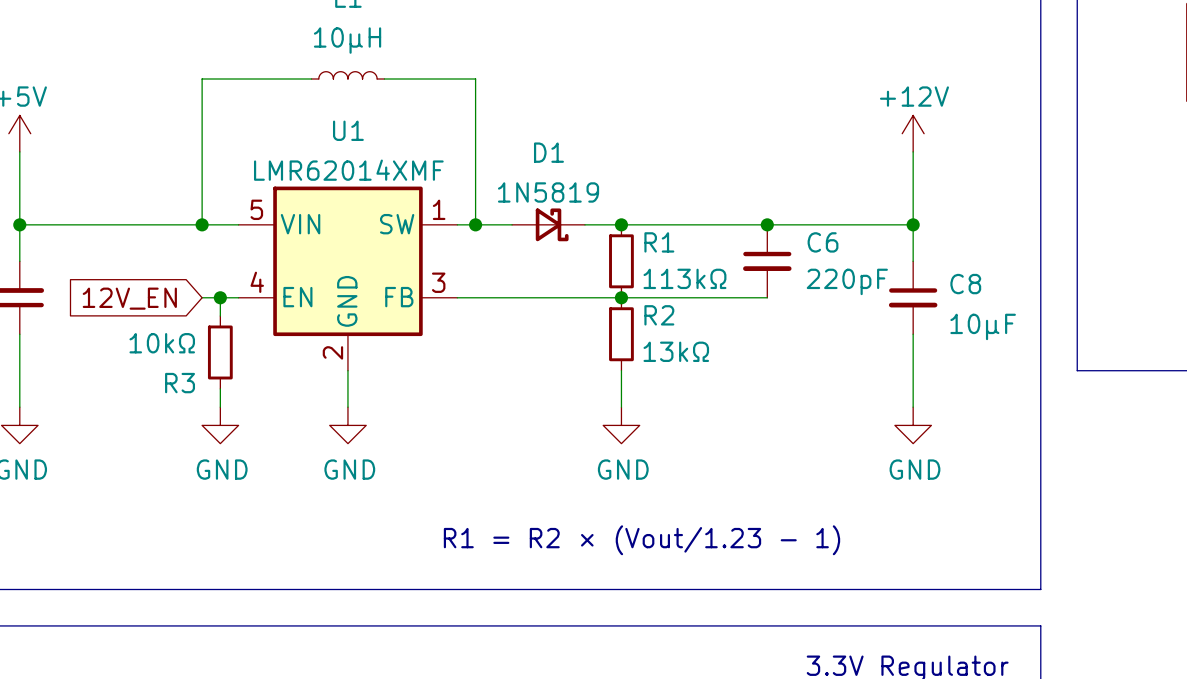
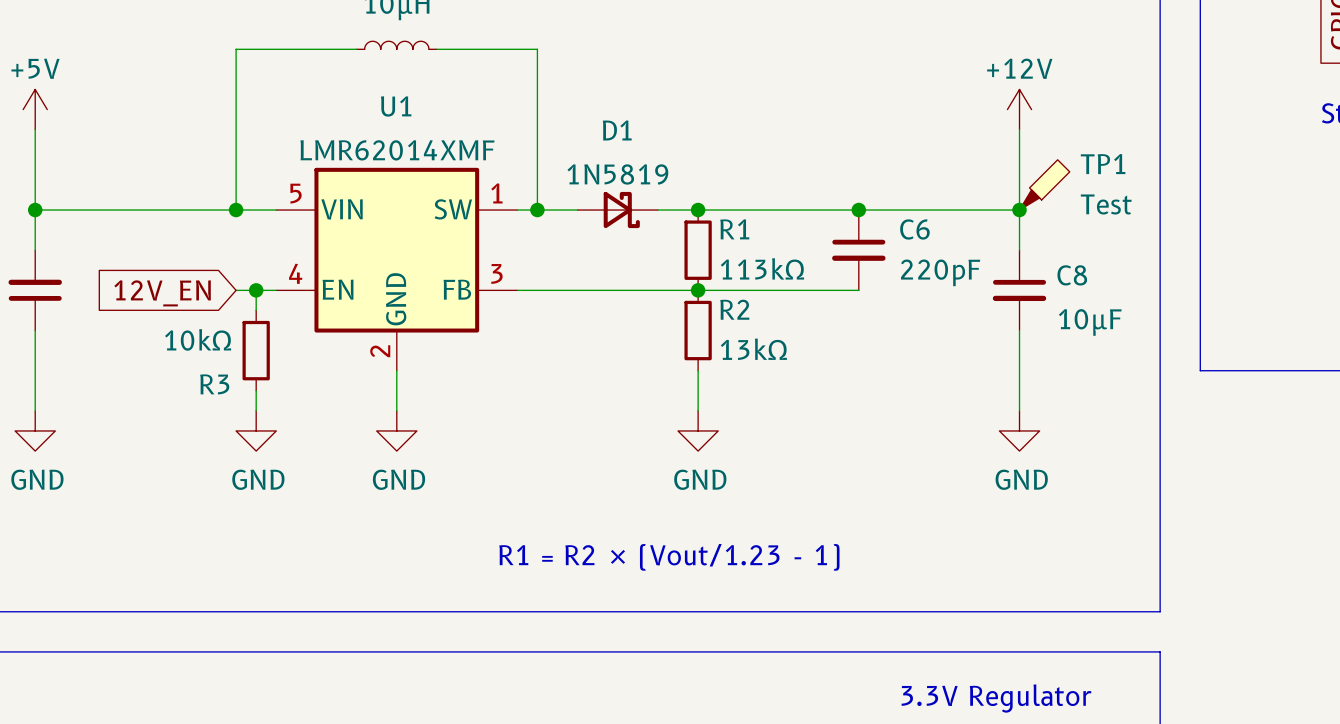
TP1: none -> Test (1044, 184)

